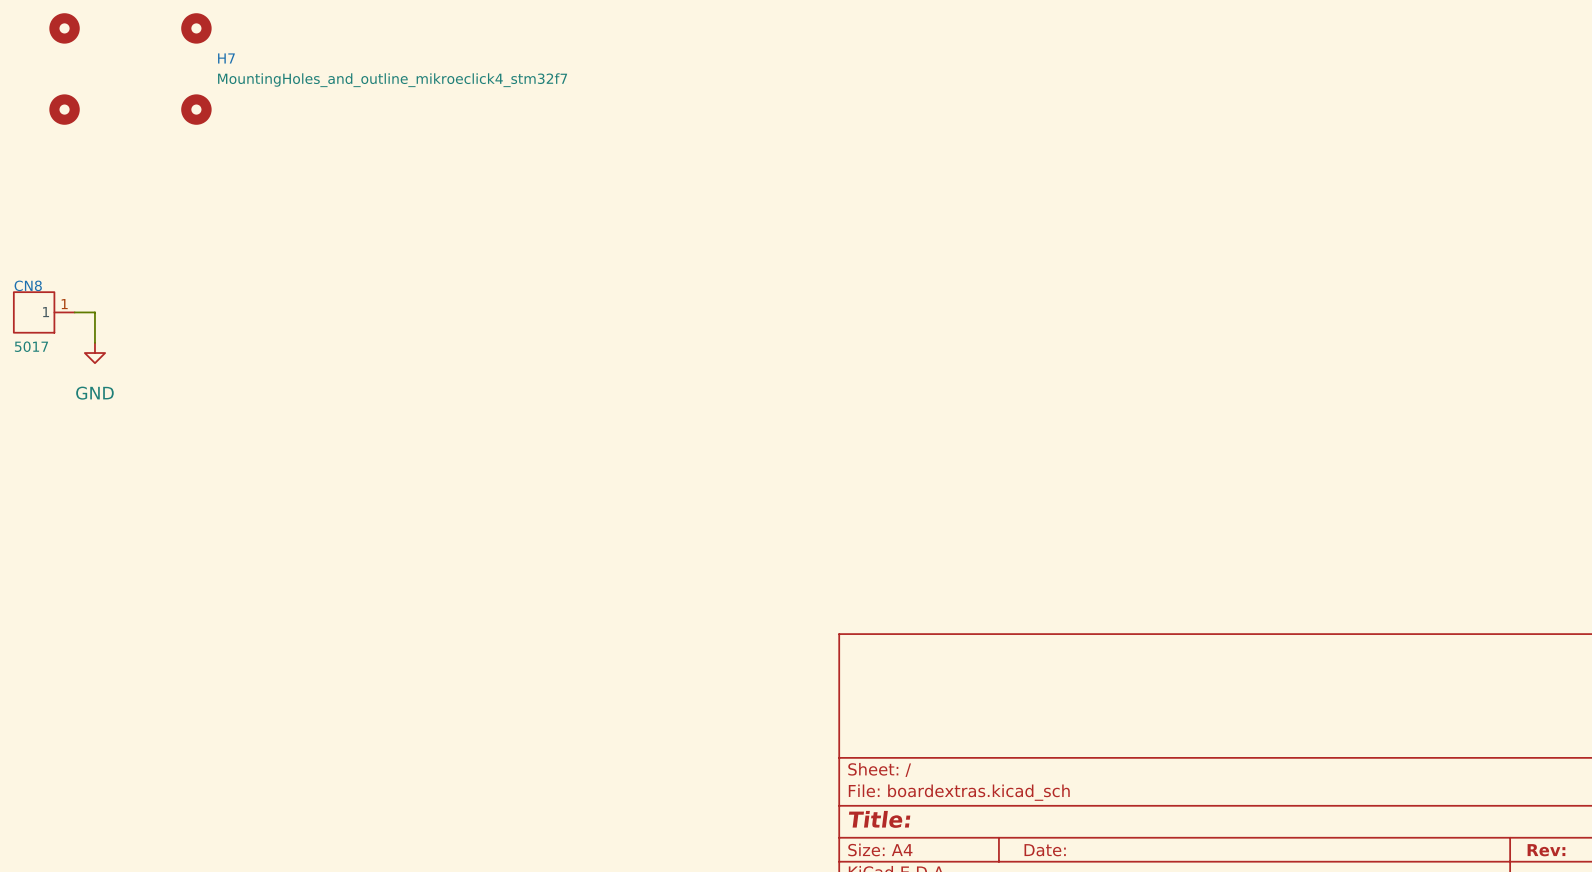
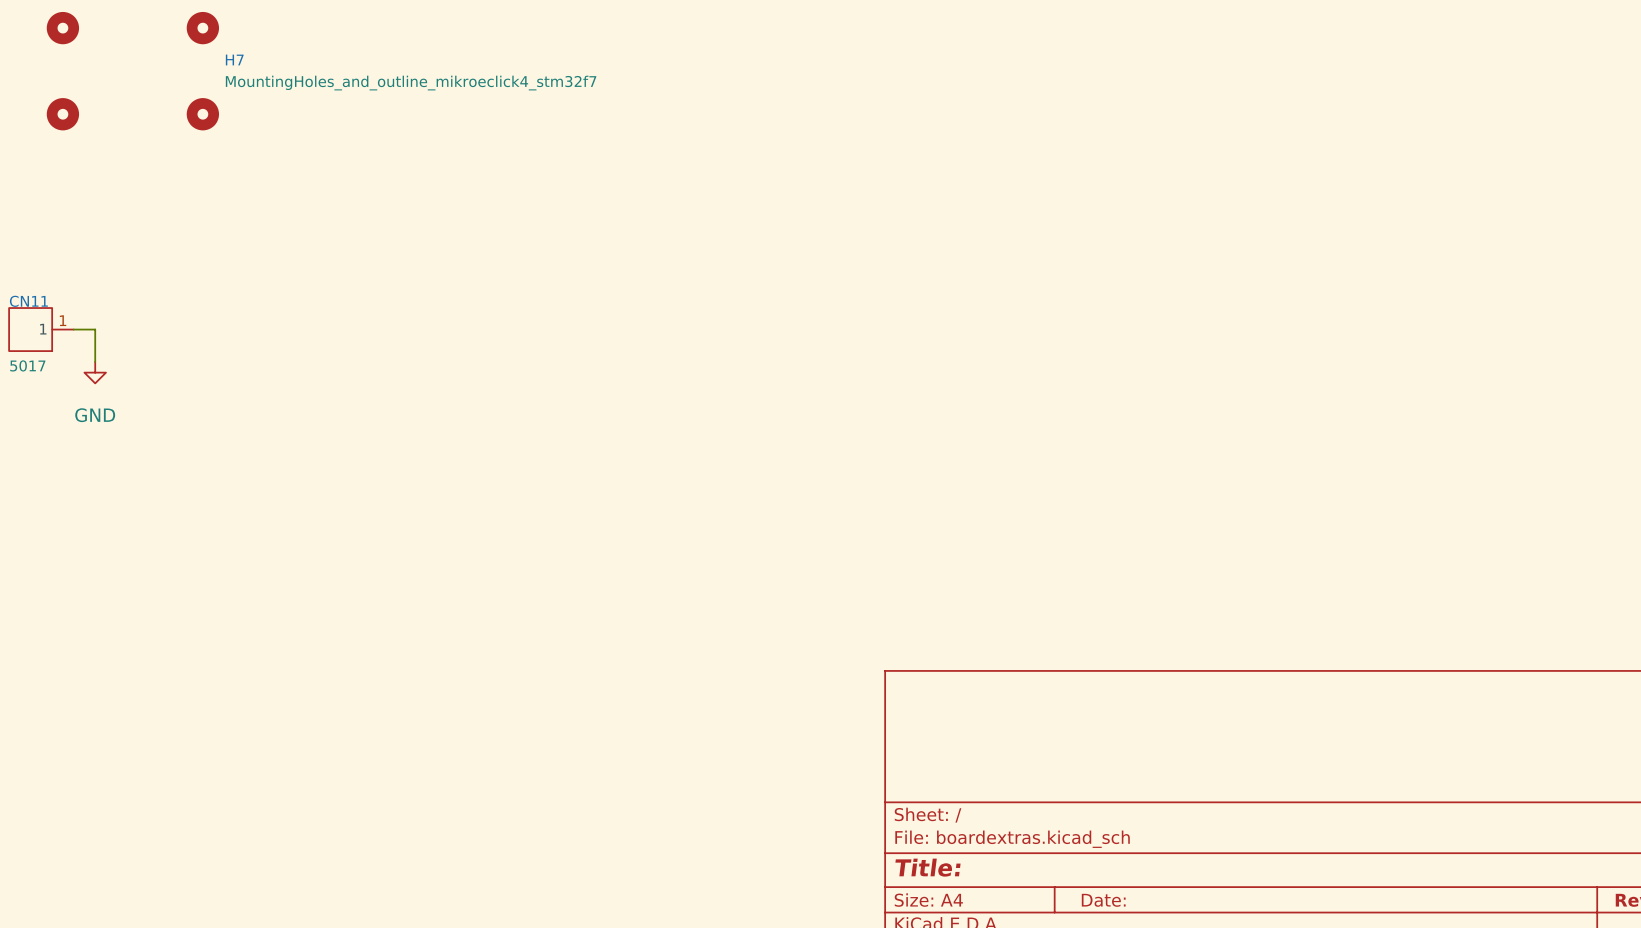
CN8 name: CN8 (28, 285) -> CN11 (28, 301)

